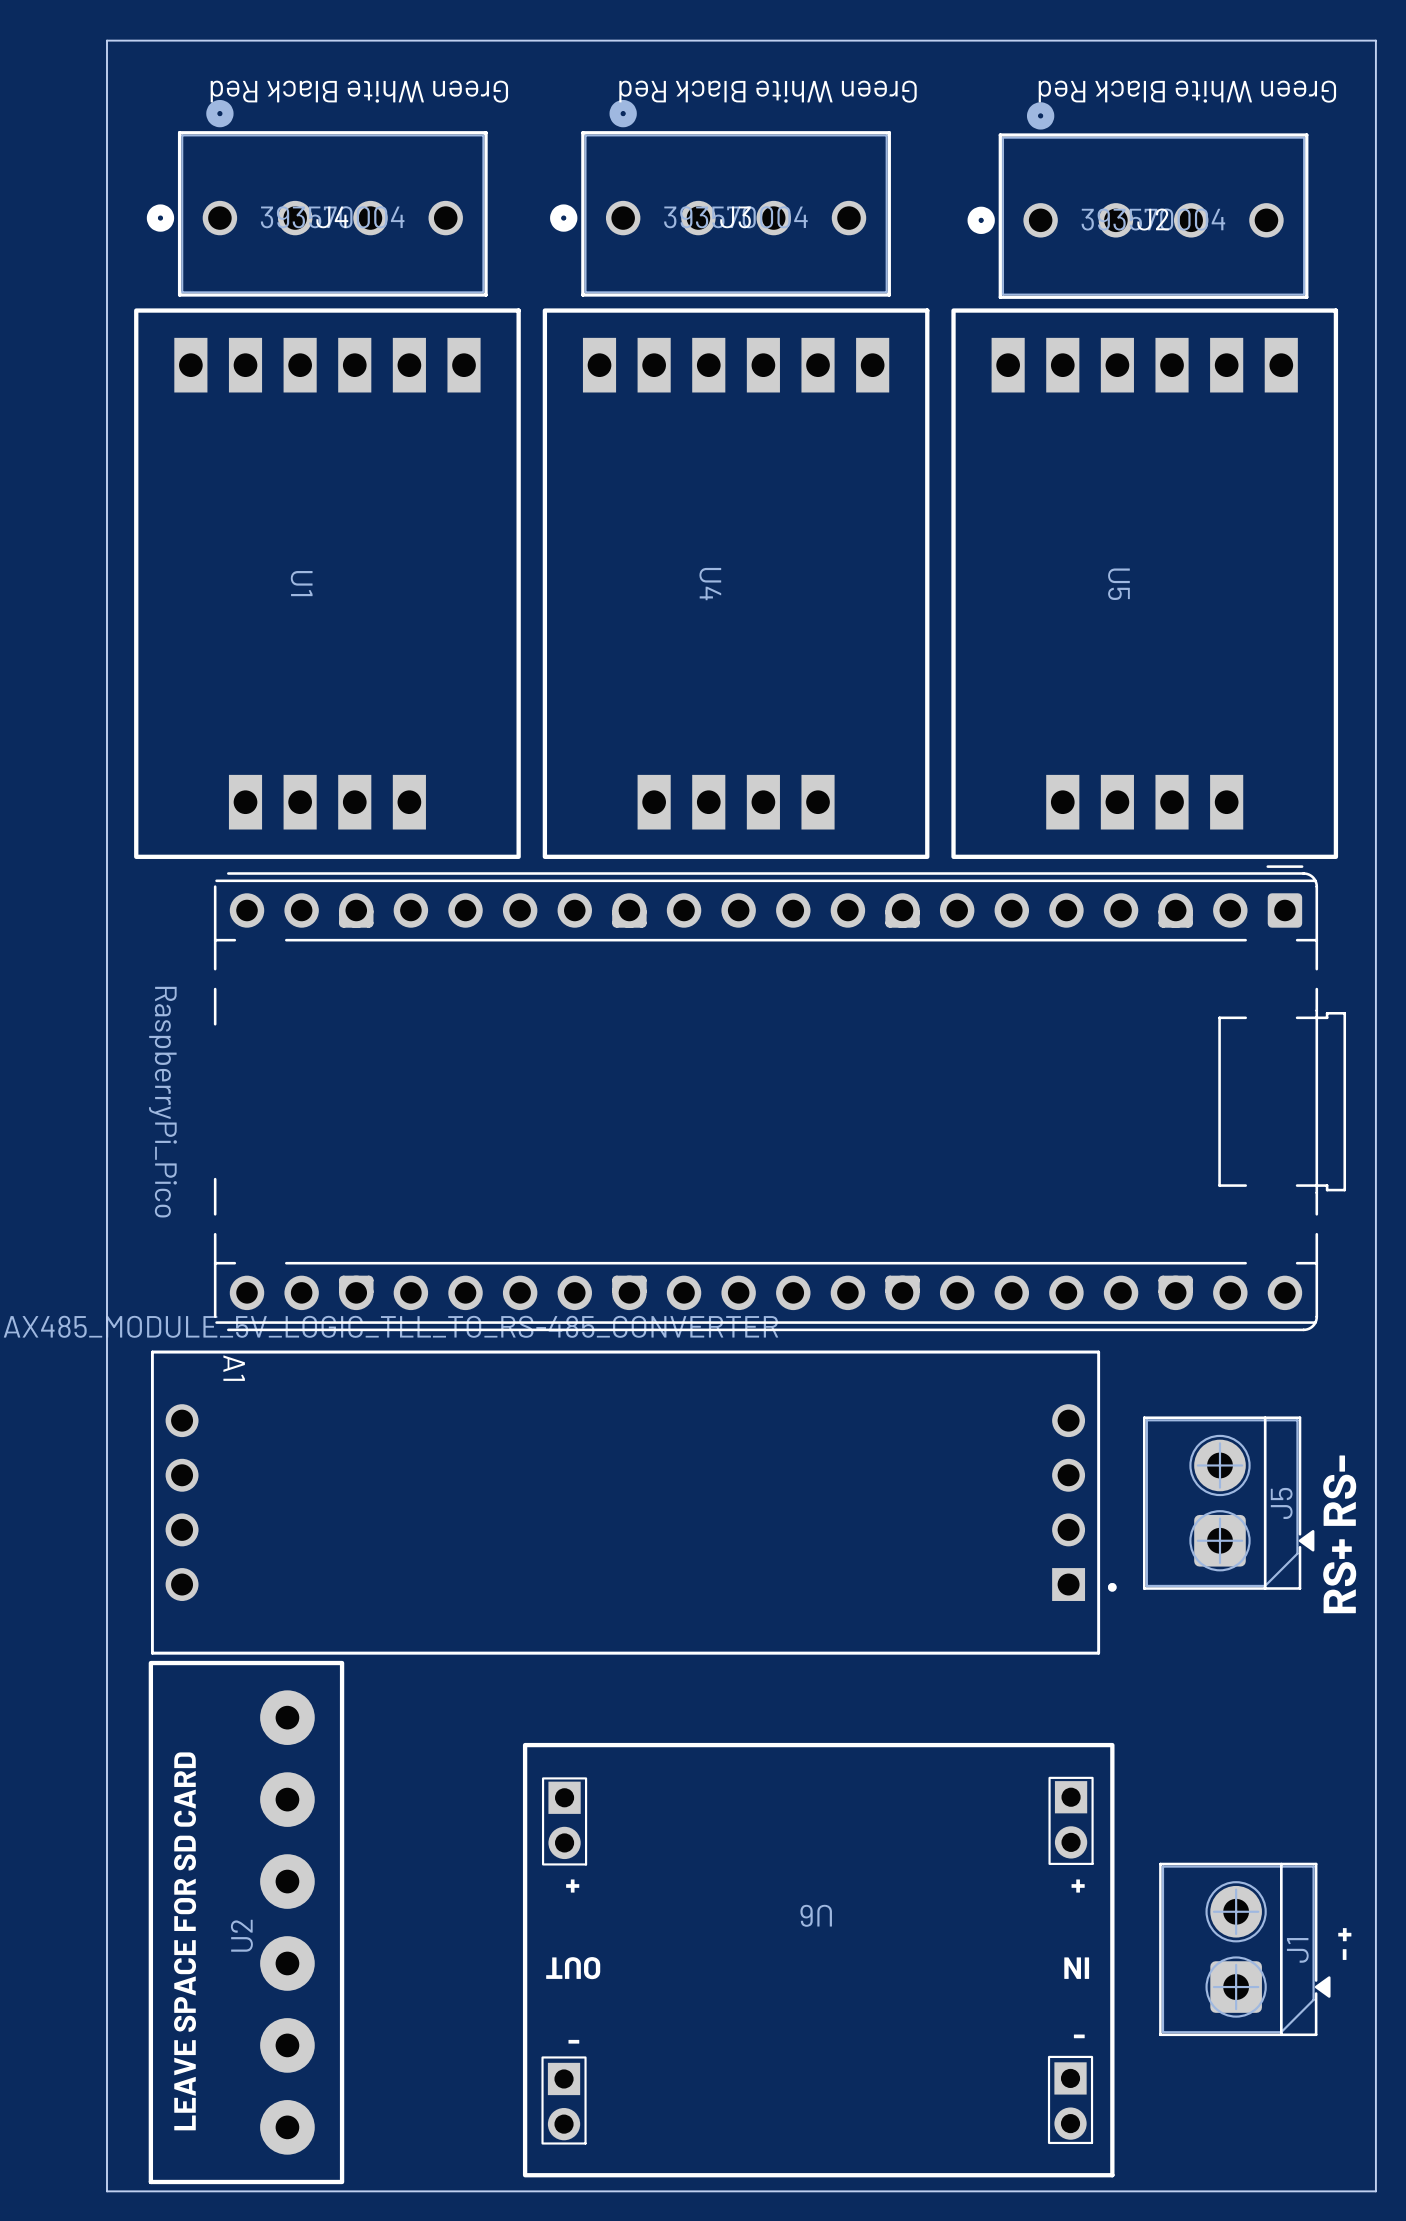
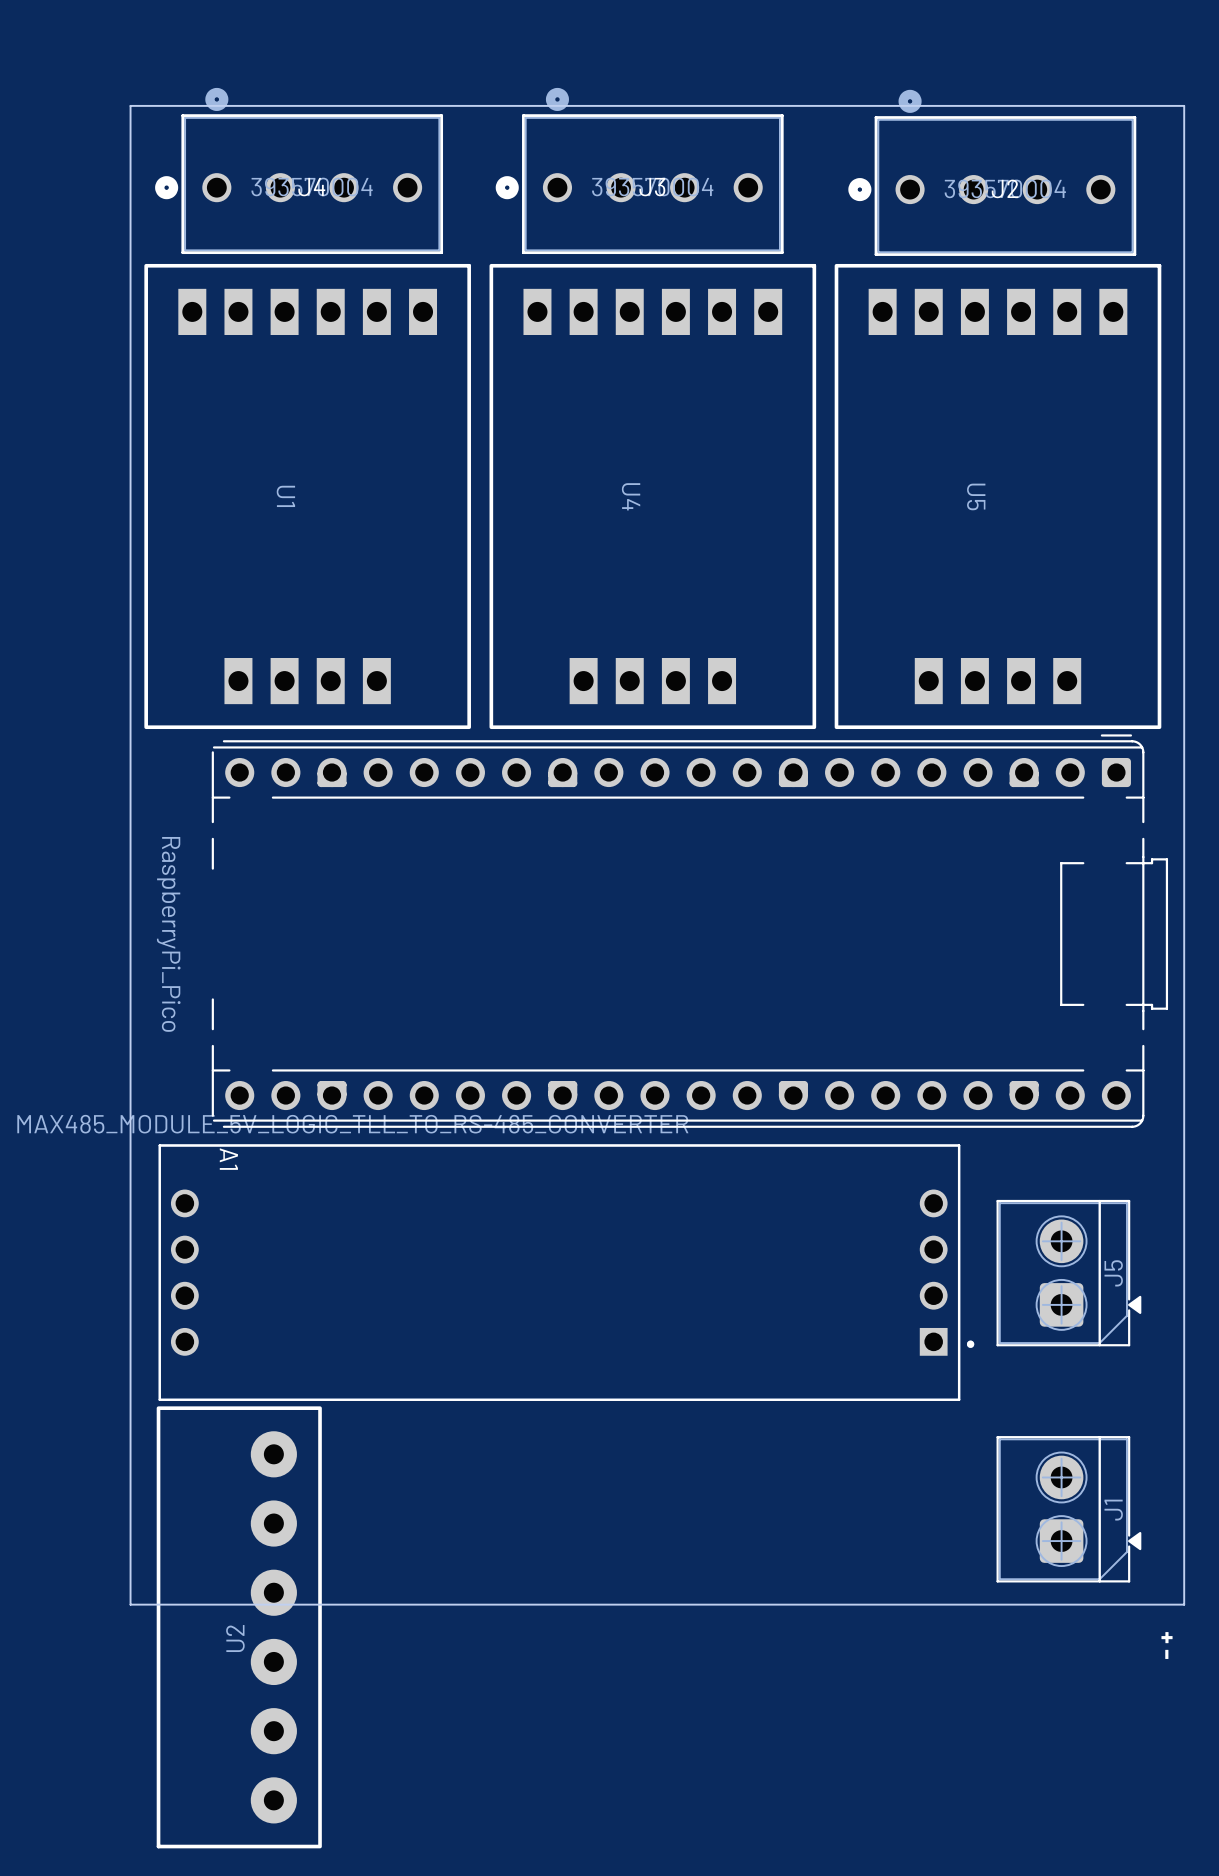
board edge: (106, 40) (1375, 40) (1375, 2191) (106, 2191) (106, 40) -> (130, 105) (130, 1604) (1184, 1604) (1184, 105) (130, 105)
text: Green White Black Red (359, 91) -> none
text: Green White Black Red (768, 91) -> none
text: Green White Black Red (1187, 91) -> none
text: RS+ RS- (1339, 1534) -> none
text: LEAVE SPACE FOR SD CARD (185, 1941) -> none
J1 position: (1244, 1949) -> (1068, 1509)
U6: (818, 1960) -> none

